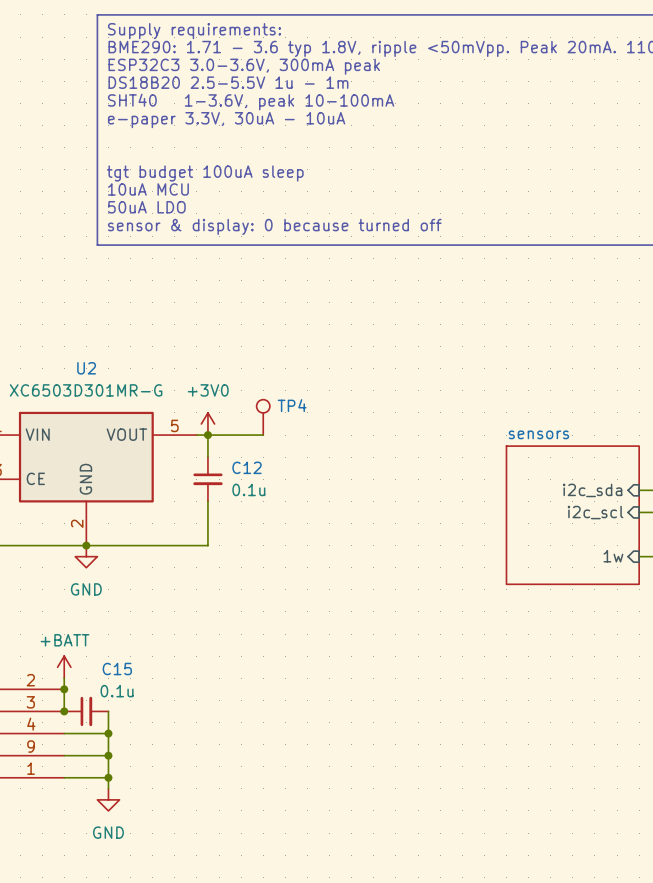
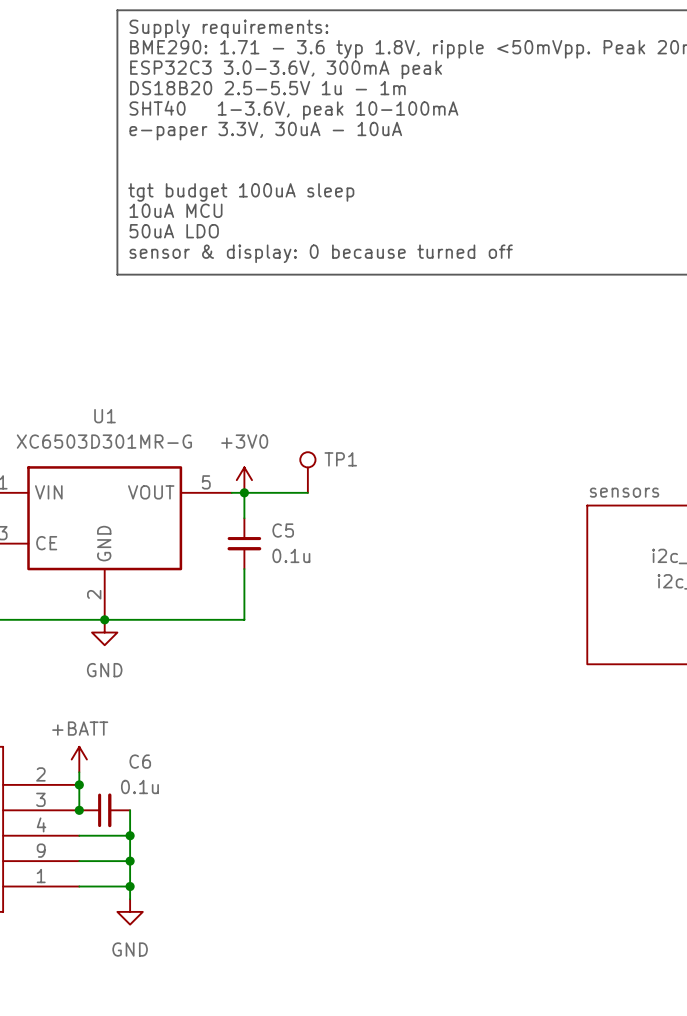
U2 name: U2 (86, 368) -> U1 (105, 416)
TP4 name: TP4 (292, 405) -> TP1 (340, 459)
C12 name: C12 (247, 467) -> C5 (283, 530)
C15 name: C15 (117, 669) -> C6 (140, 761)

